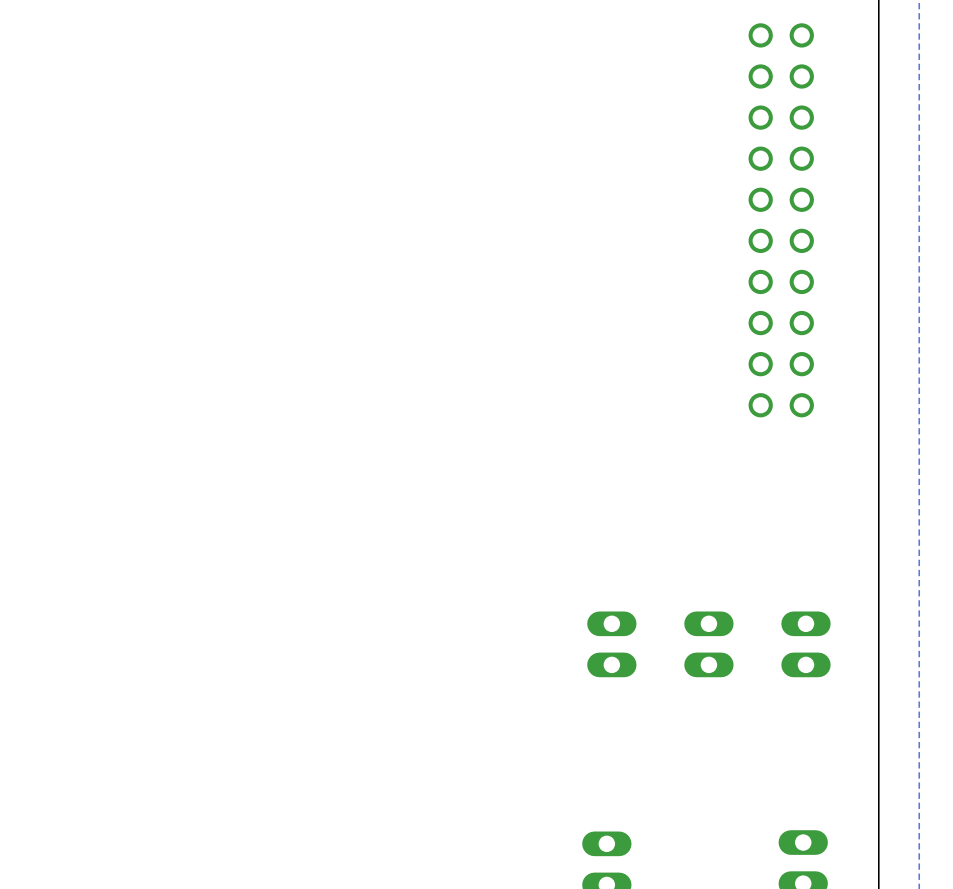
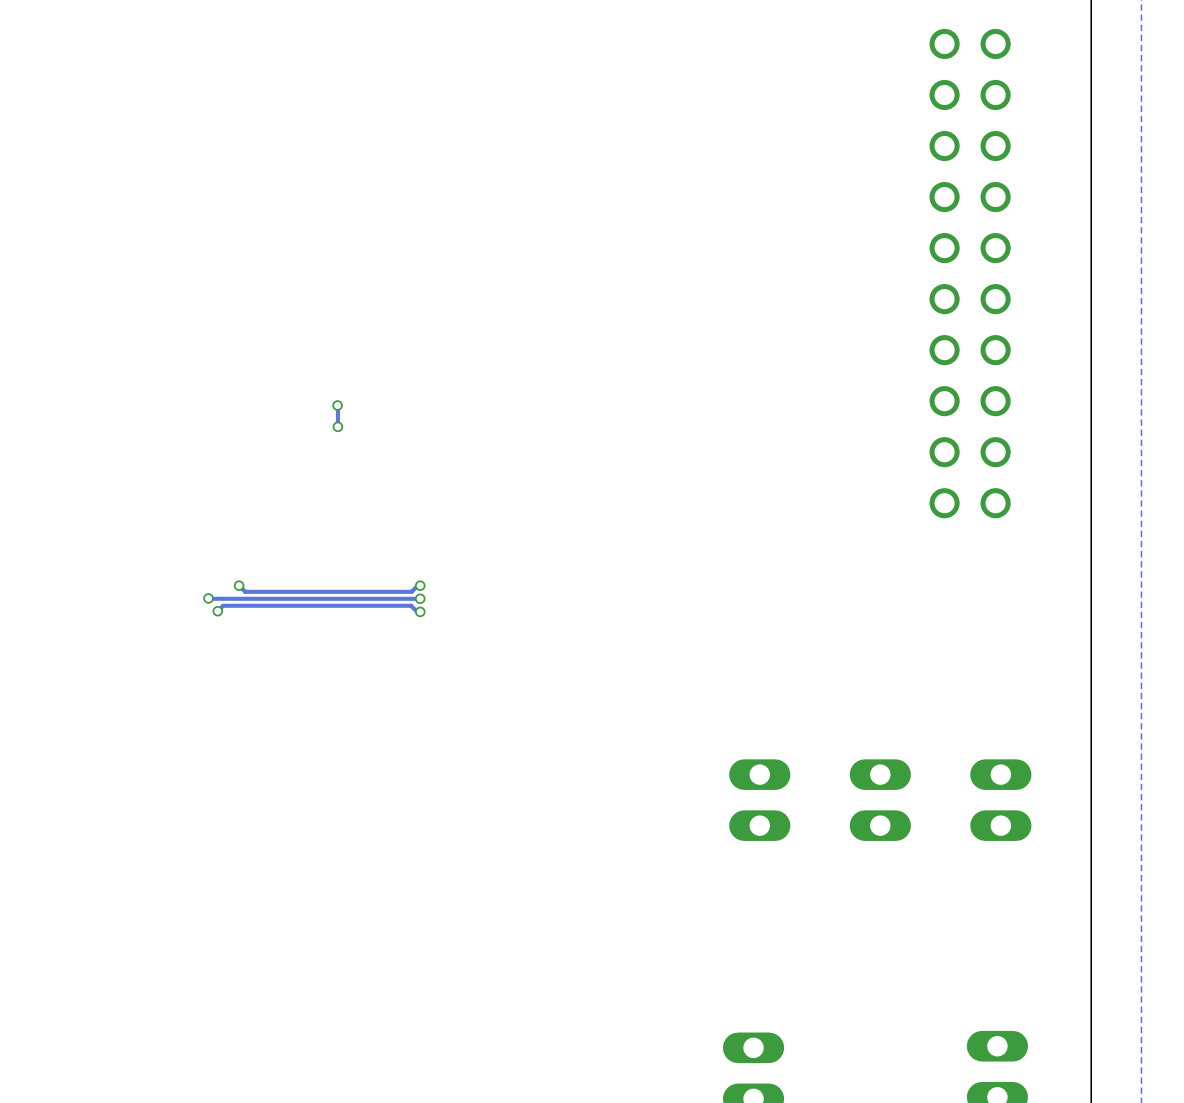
track: none -> (337, 405) (337, 426)
via: none -> (337, 405)
via: none -> (337, 426)
via: none -> (239, 585)
track: none -> (420, 585) (411, 591) (245, 591) (239, 585)
via: none -> (420, 585)
track: none -> (208, 598) (420, 598)
via: none -> (208, 598)
via: none -> (420, 598)
track: none -> (217, 611) (223, 605) (411, 605) (417, 611) (420, 611)
via: none -> (217, 611)
via: none -> (420, 611)

